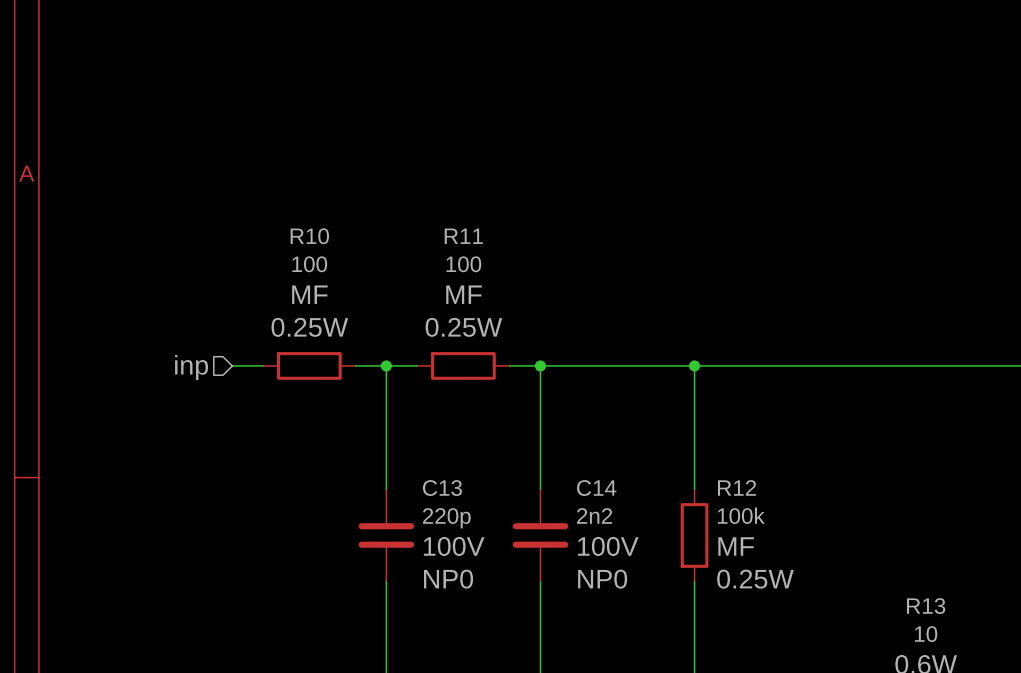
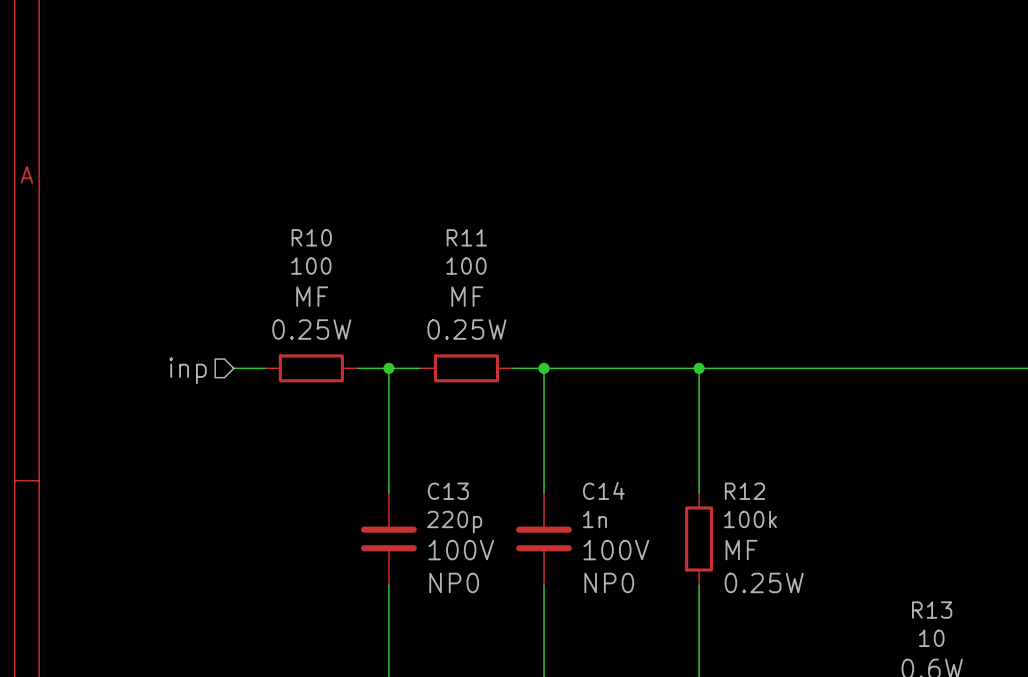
C14 value: 2n2 (594, 515) -> 1n (594, 519)

